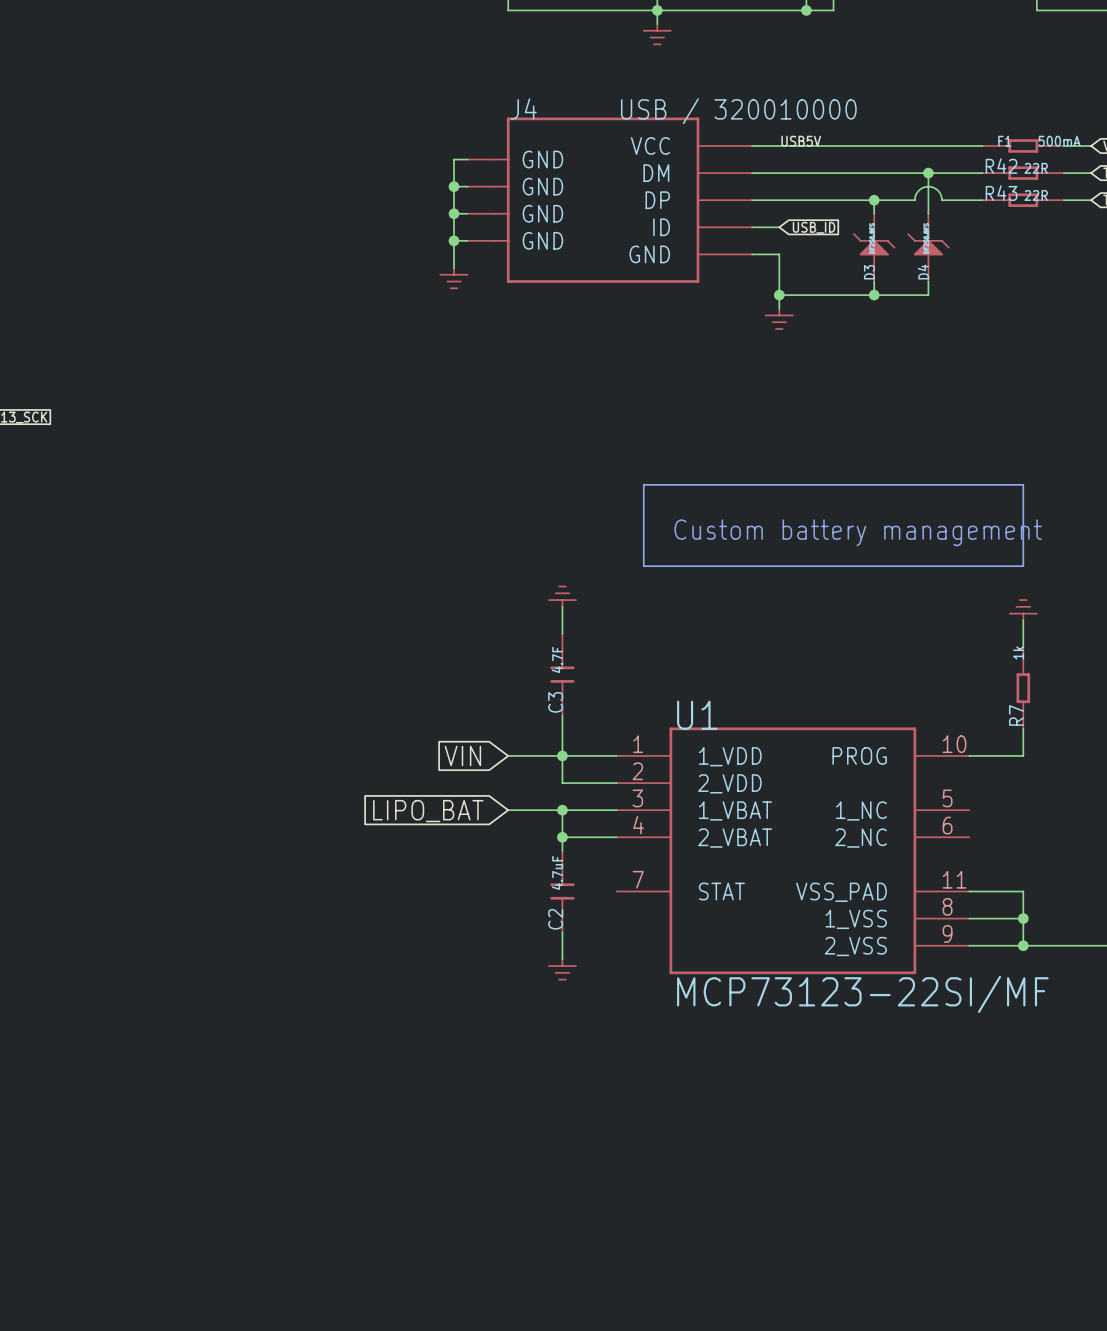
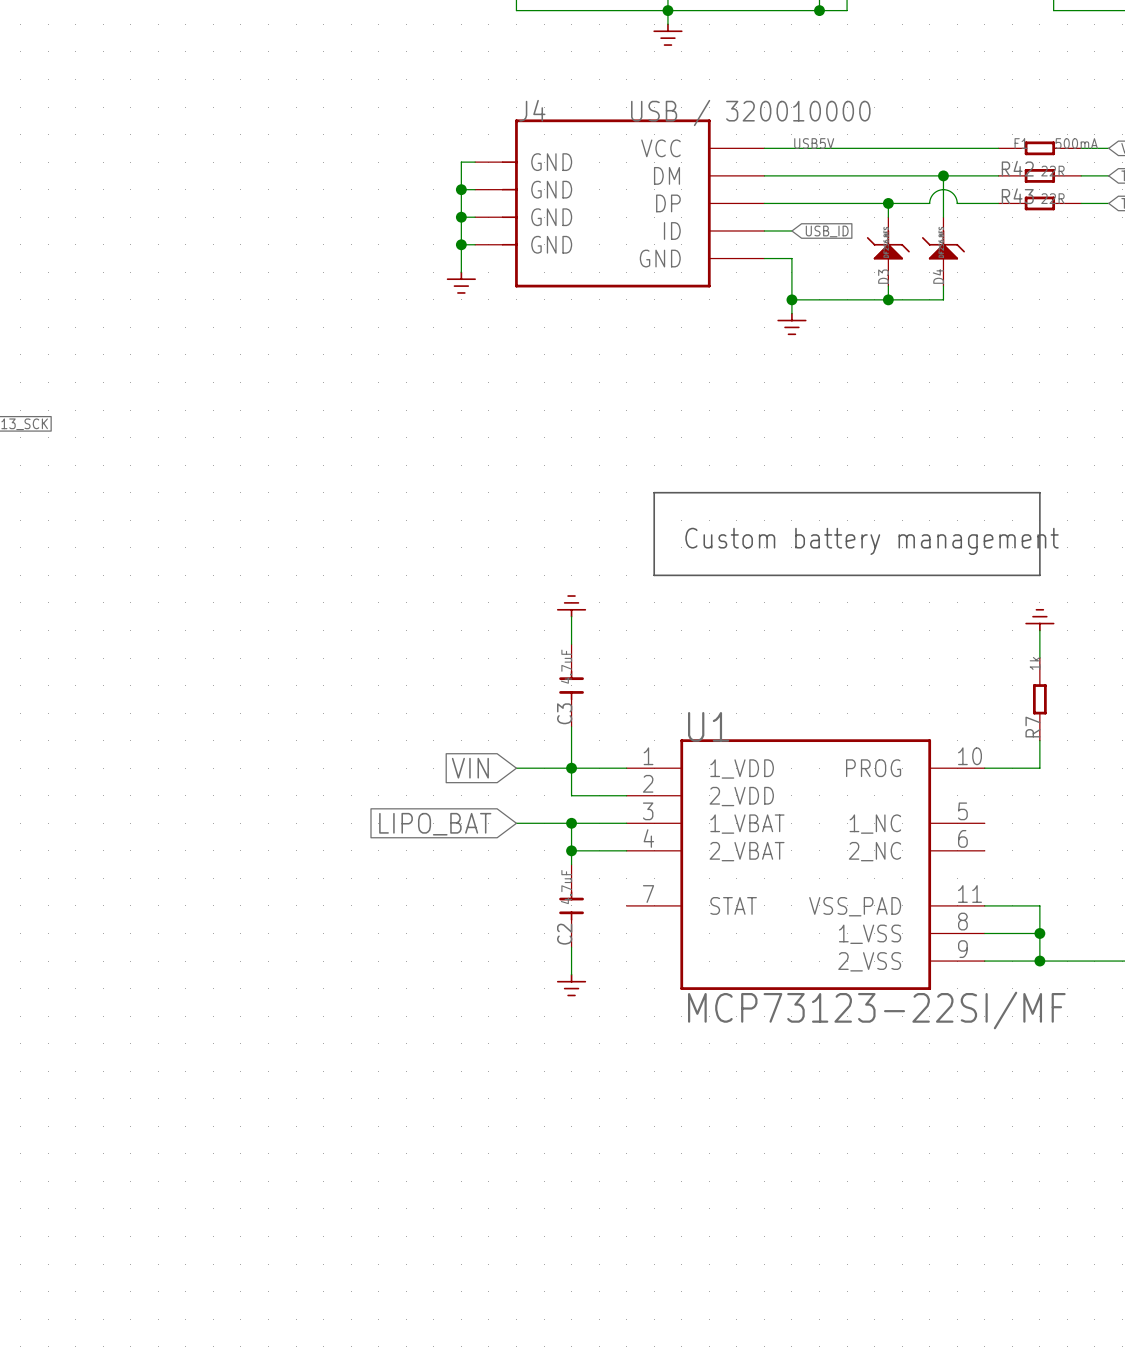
C3 value: 4.7F (557, 659) -> 4.7uF (566, 666)

